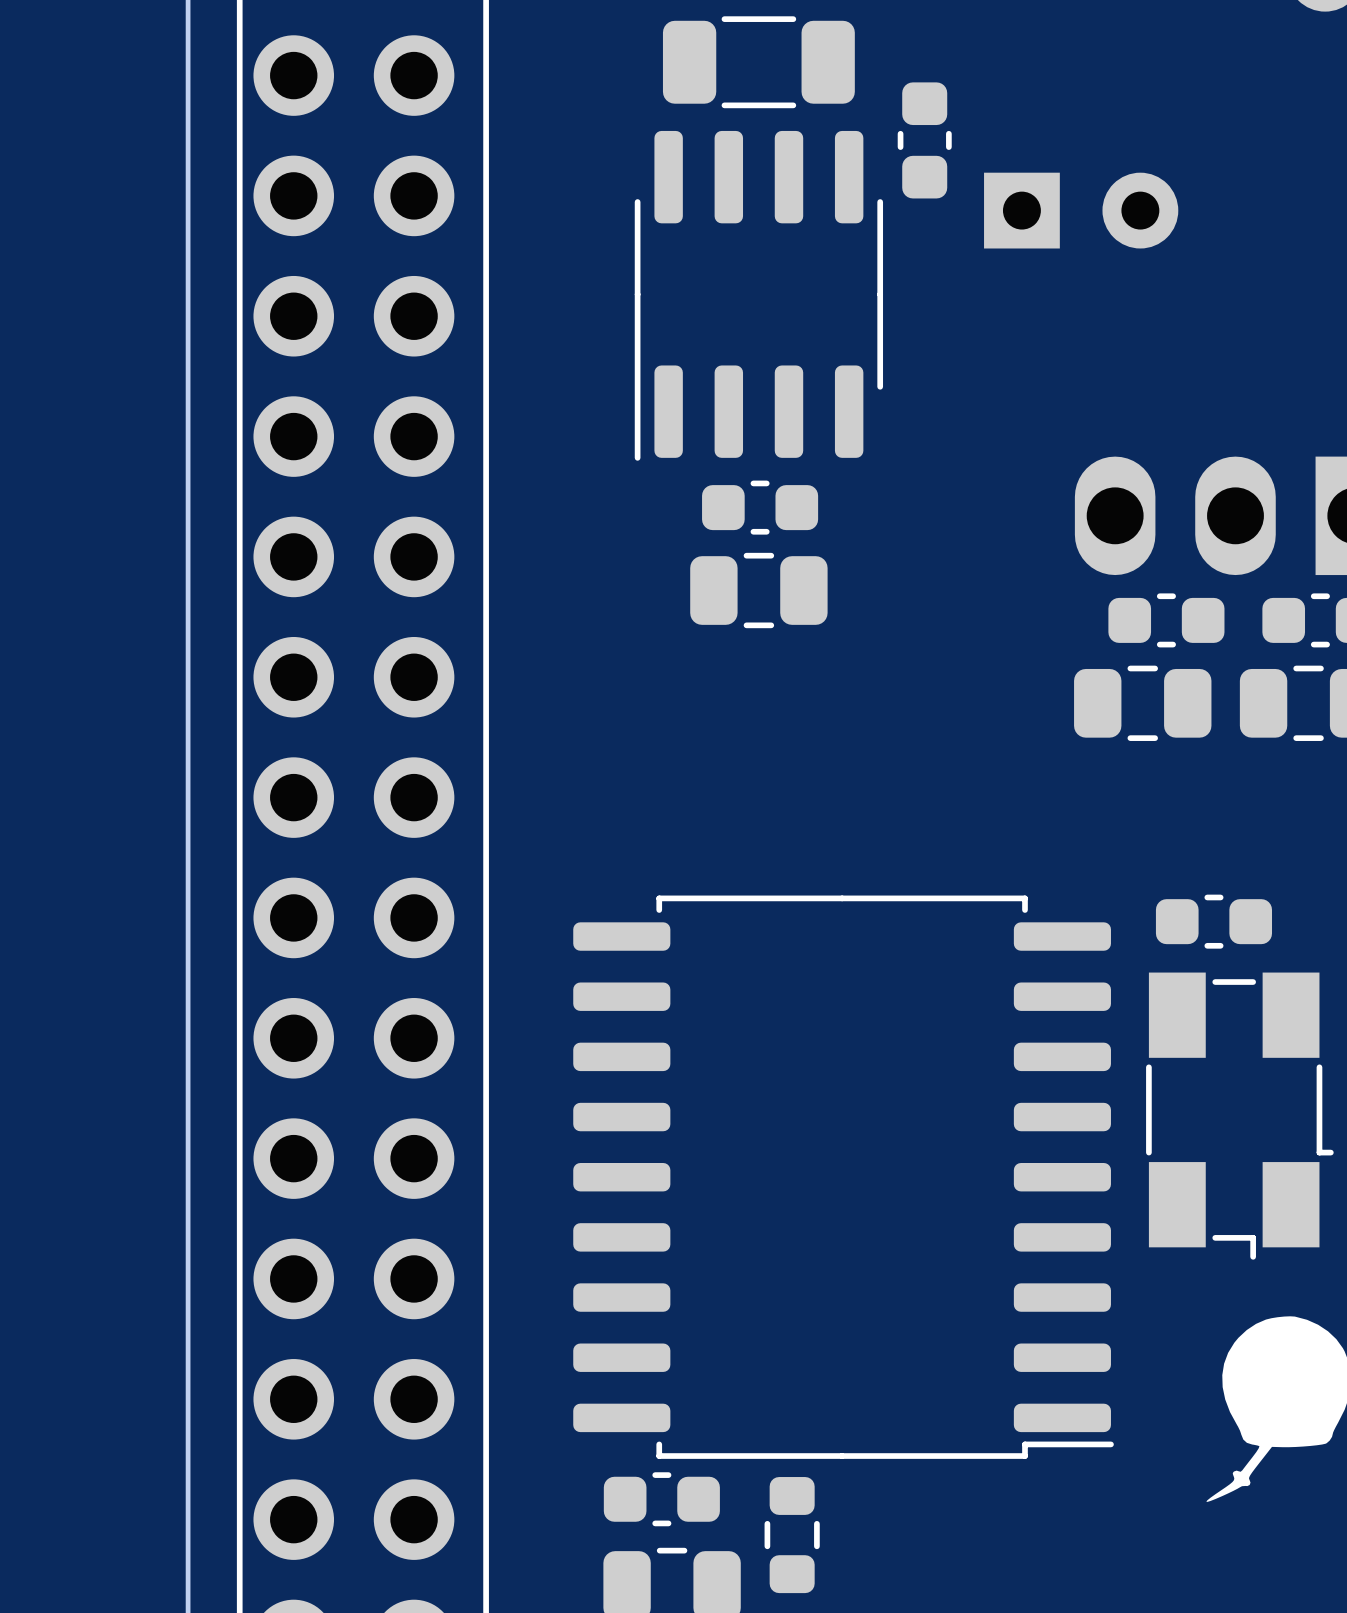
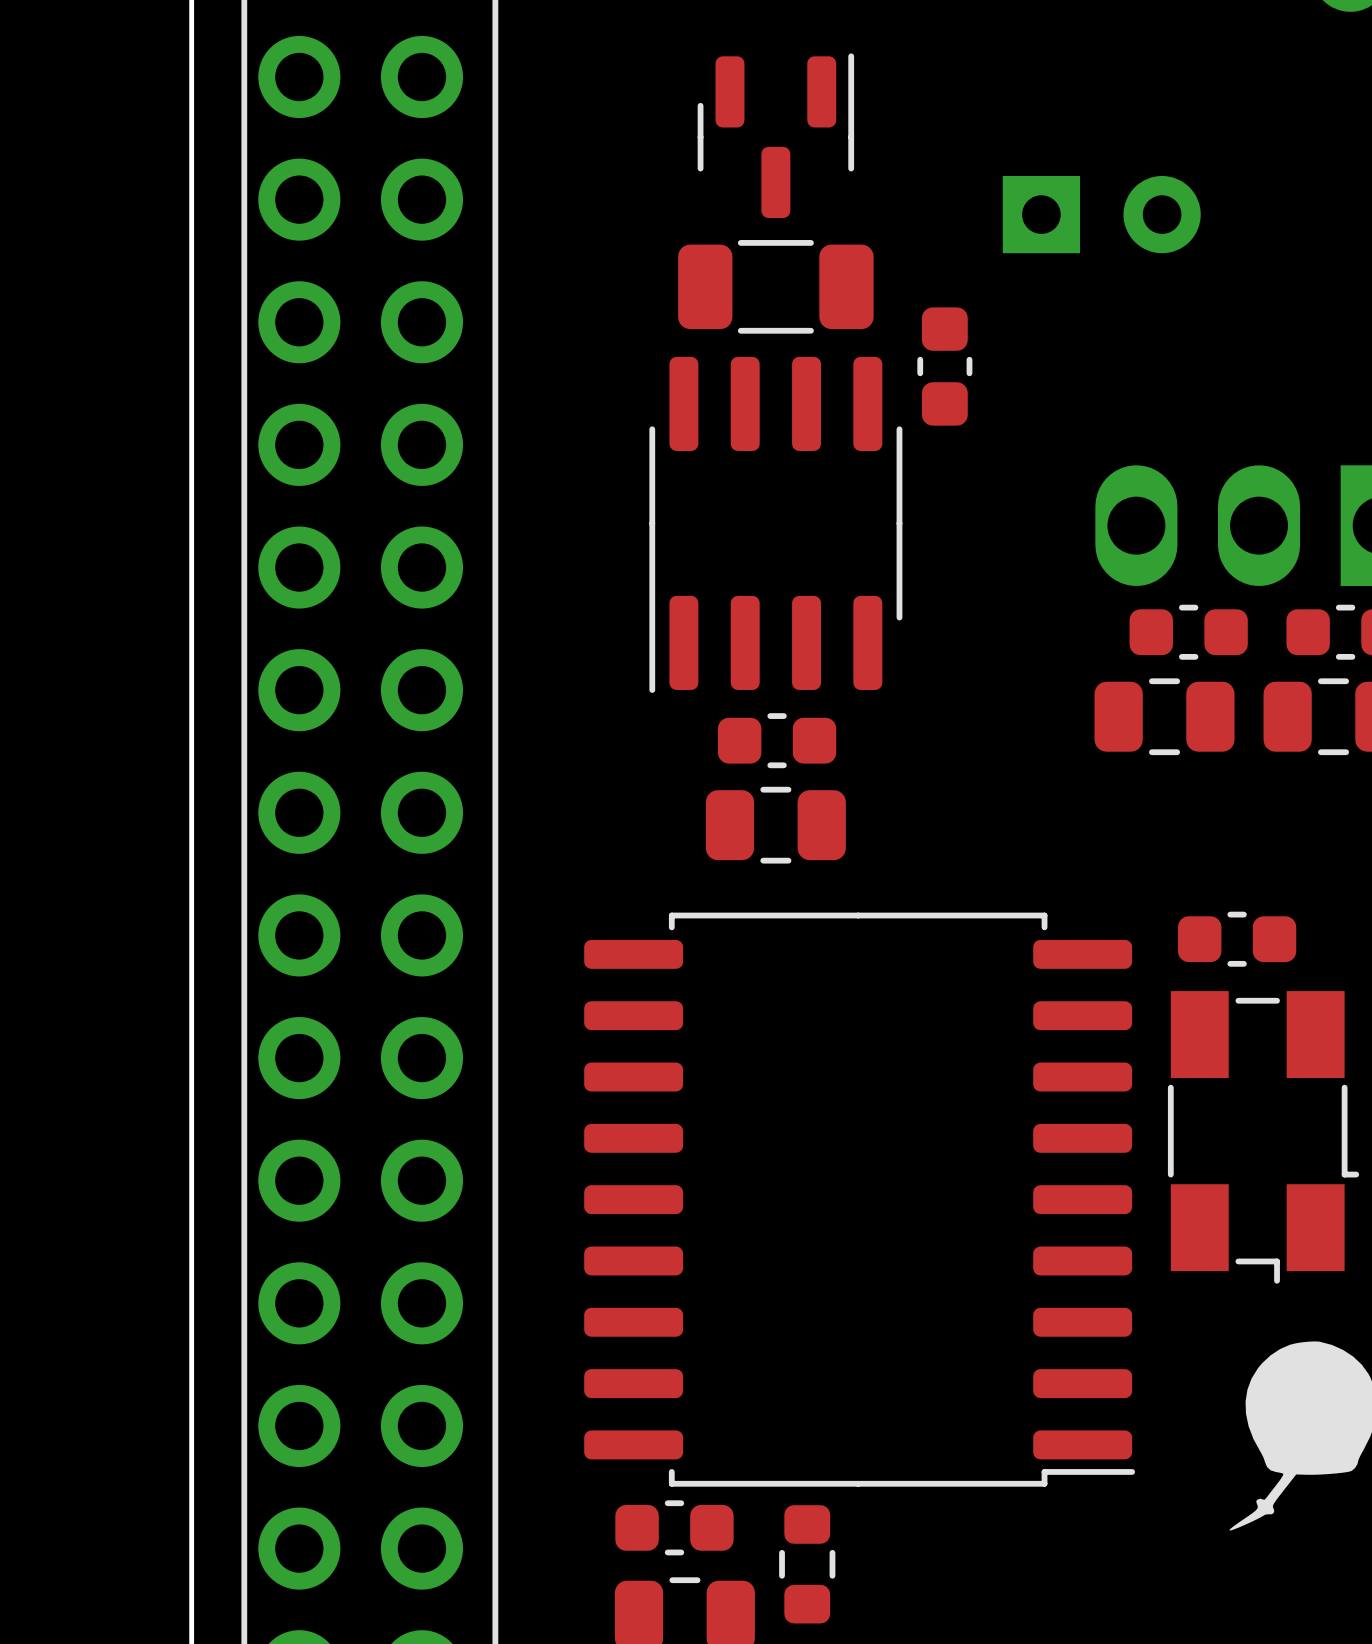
part: (758, 62) -> none
part footprint: [634, 130, 884, 461] -> [678, 240, 874, 334]
part: none -> (775, 135)
part position: (924, 140) -> (944, 366)
part footprint: [702, 480, 819, 535] -> [649, 356, 903, 693]
part position: (758, 590) -> (775, 825)
part: none -> (777, 740)

